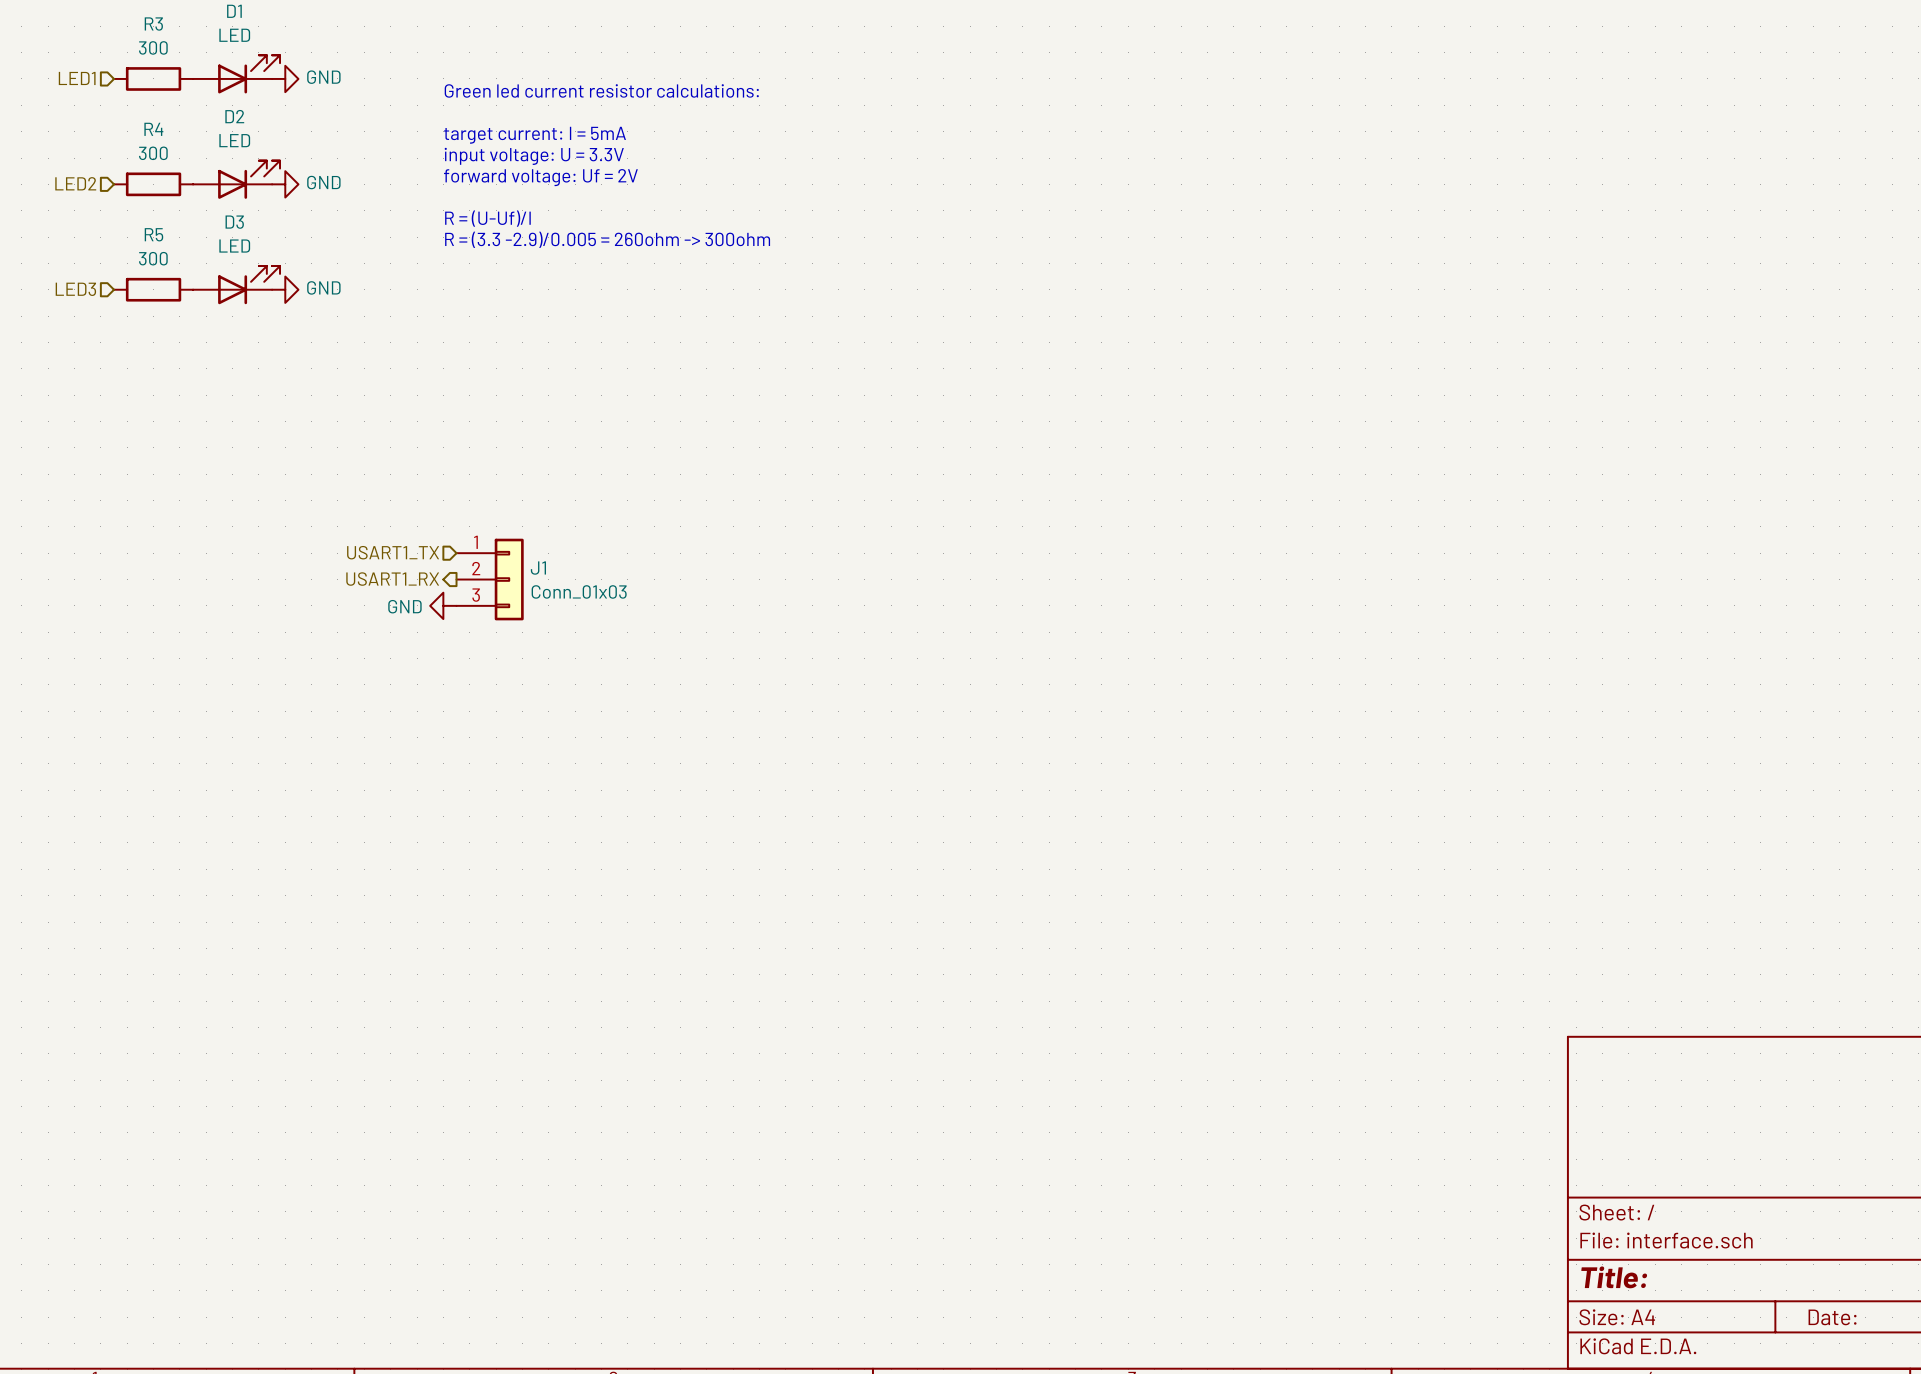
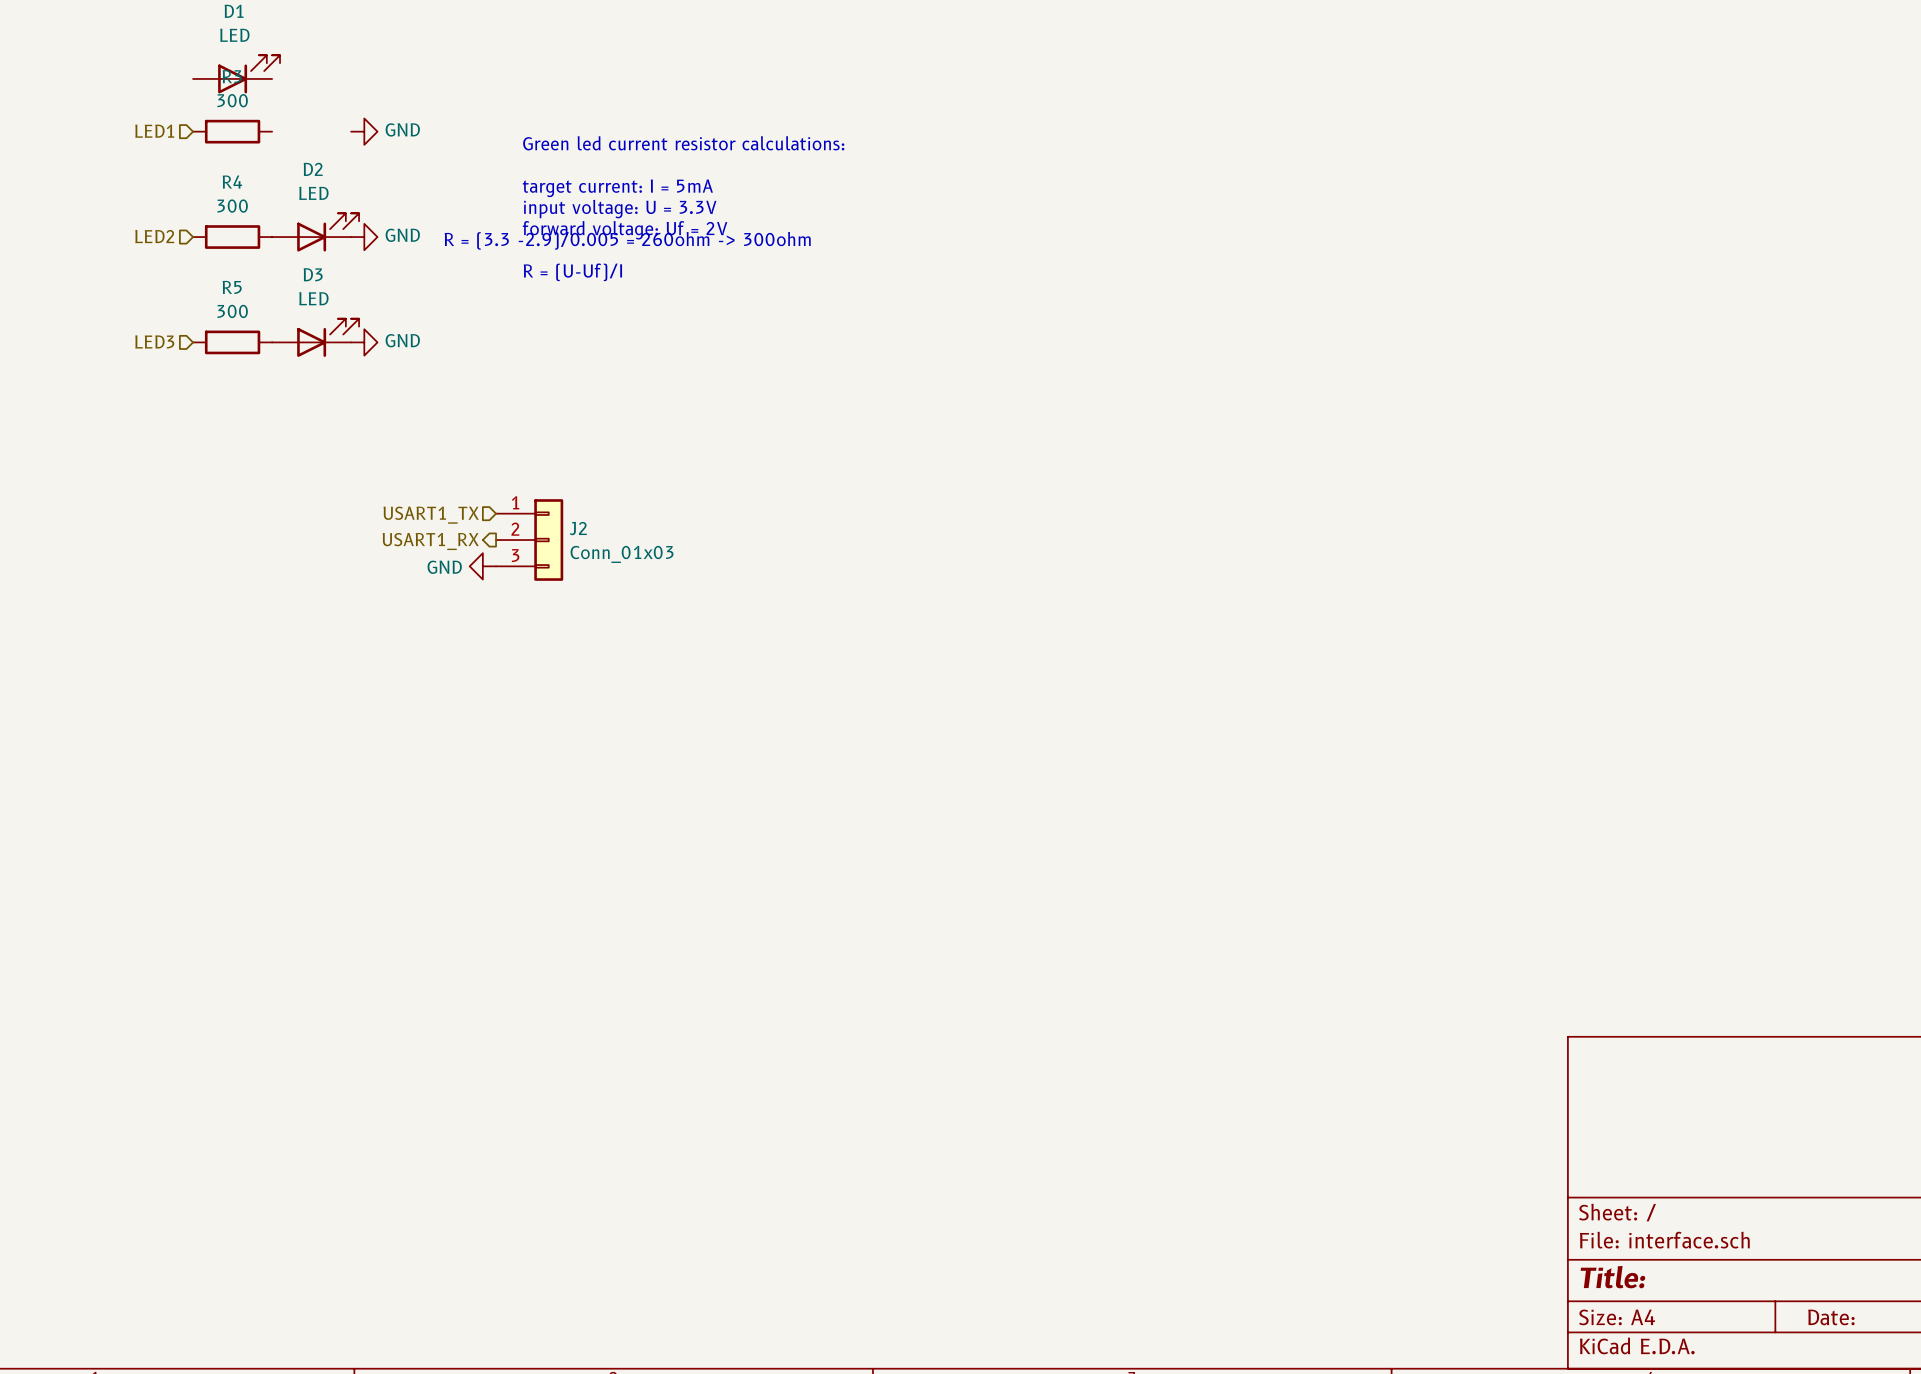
hierarchical label position: LED1 (77, 78) -> LED1 (154, 131)
R3 position: (153, 78) -> (232, 131)
power symbol: GND (285, 78) -> none
text position: Green led current resistor calculations: (601, 90) -> Green led current resistor calculations: (683, 143)
power symbol: none -> GND (364, 131)
text position: target current: I = 5mA (534, 135) -> target current: I = 5mA (617, 188)
text position: input voltage: U = 3.3V (534, 156) -> input voltage: U = 3.3V (620, 209)
text position: forward voltage: Uf = 2V (540, 177) -> forward voltage: Uf = 2V (625, 230)
D2 position: (236, 179) -> (315, 232)
hierarchical label position: LED2 (75, 183) -> LED2 (154, 236)
R4 position: (153, 184) -> (232, 237)
power symbol: GND (285, 184) -> none
text position: R = (U-Uf)/I (487, 218) -> R = (U-Uf)/I (572, 272)
power symbol: none -> GND (364, 237)
D3 position: (236, 285) -> (315, 337)
hierarchical label position: LED3 (75, 289) -> LED3 (154, 341)
R5 position: (153, 289) -> (232, 342)
power symbol: GND (285, 289) -> none
power symbol: none -> GND (364, 342)
J2: none -> Conn_01x03 (529, 540)
hierarchical label position: USART1_TX (393, 552) -> USART1_TX (431, 515)
hierarchical label position: USART1_RX (392, 579) -> USART1_RX (430, 541)
J1: Conn_01x03 (490, 579) -> none
power symbol position: GND (443, 605) -> GND (482, 566)

